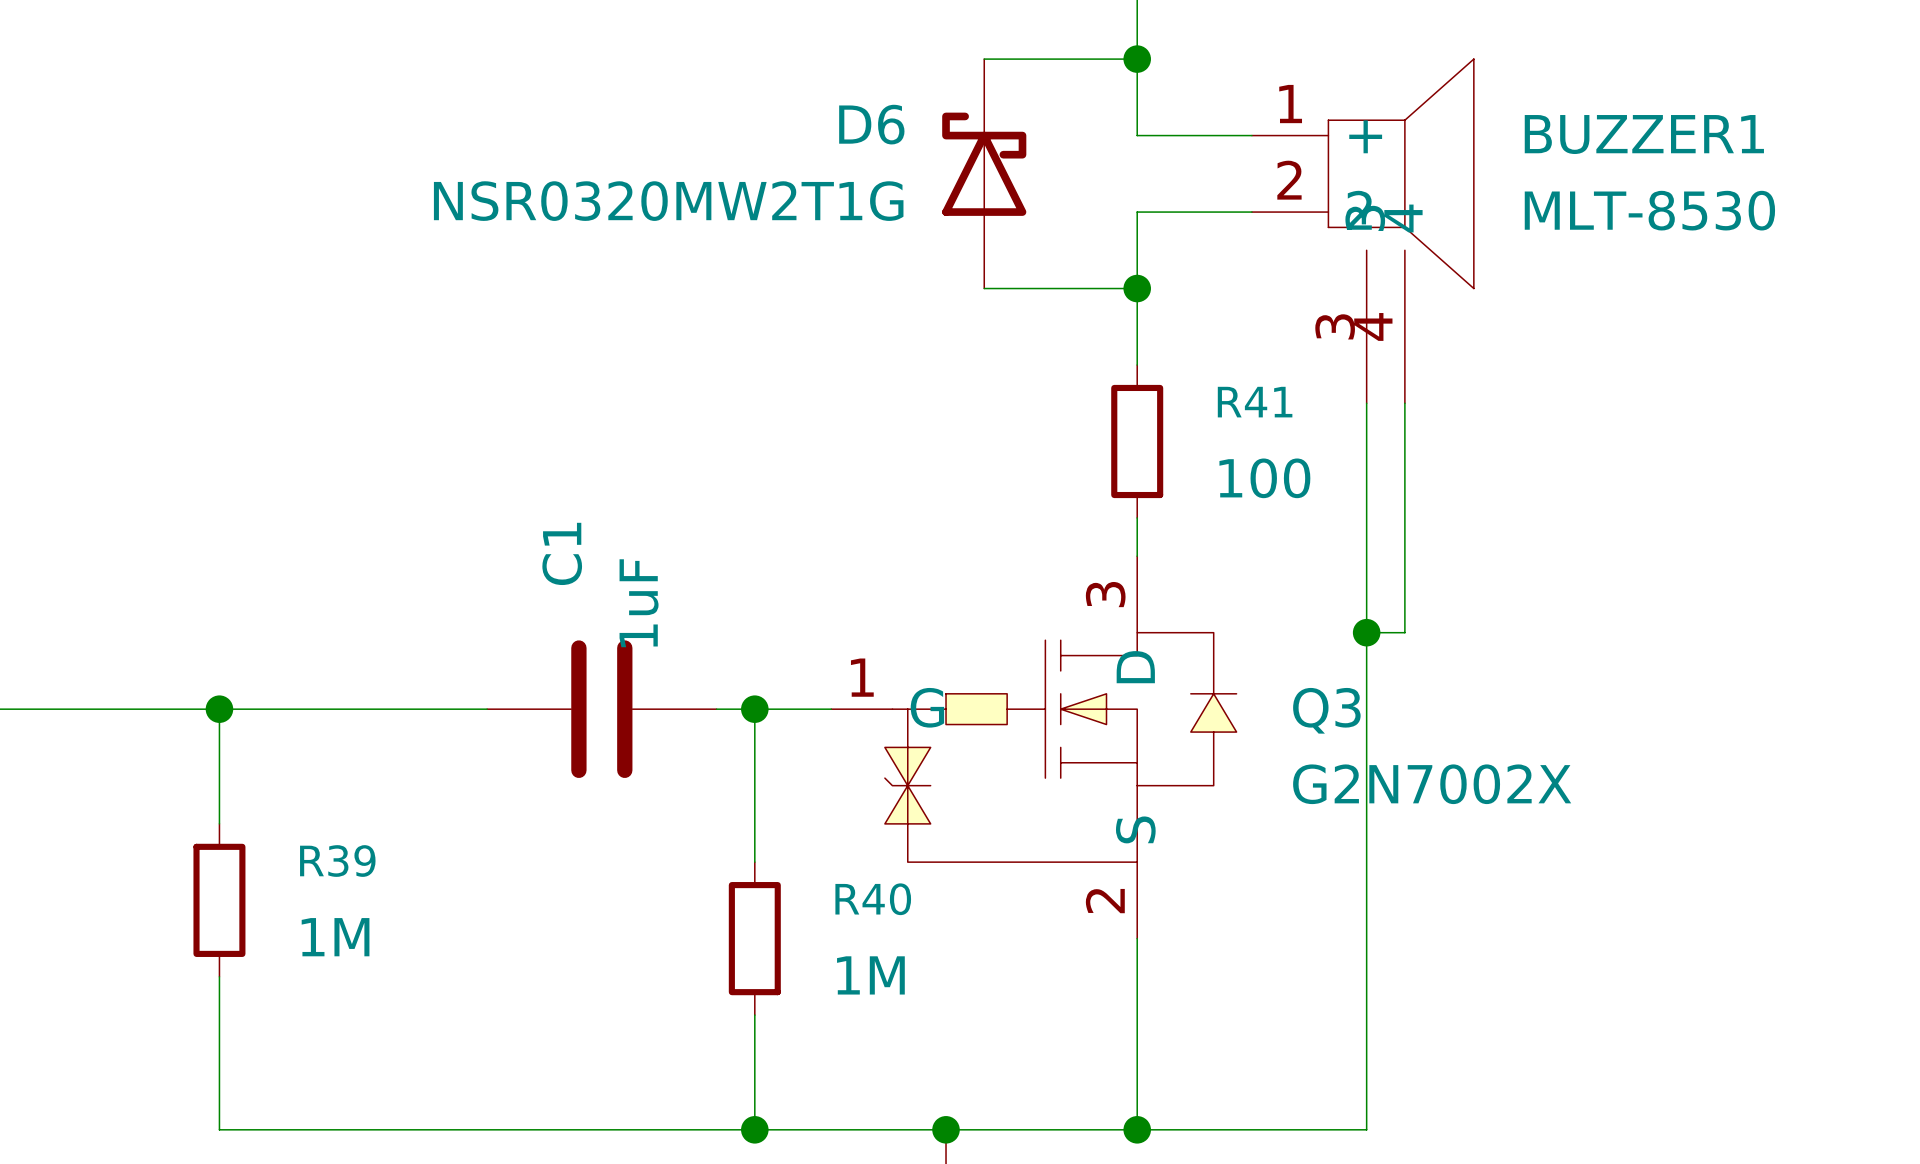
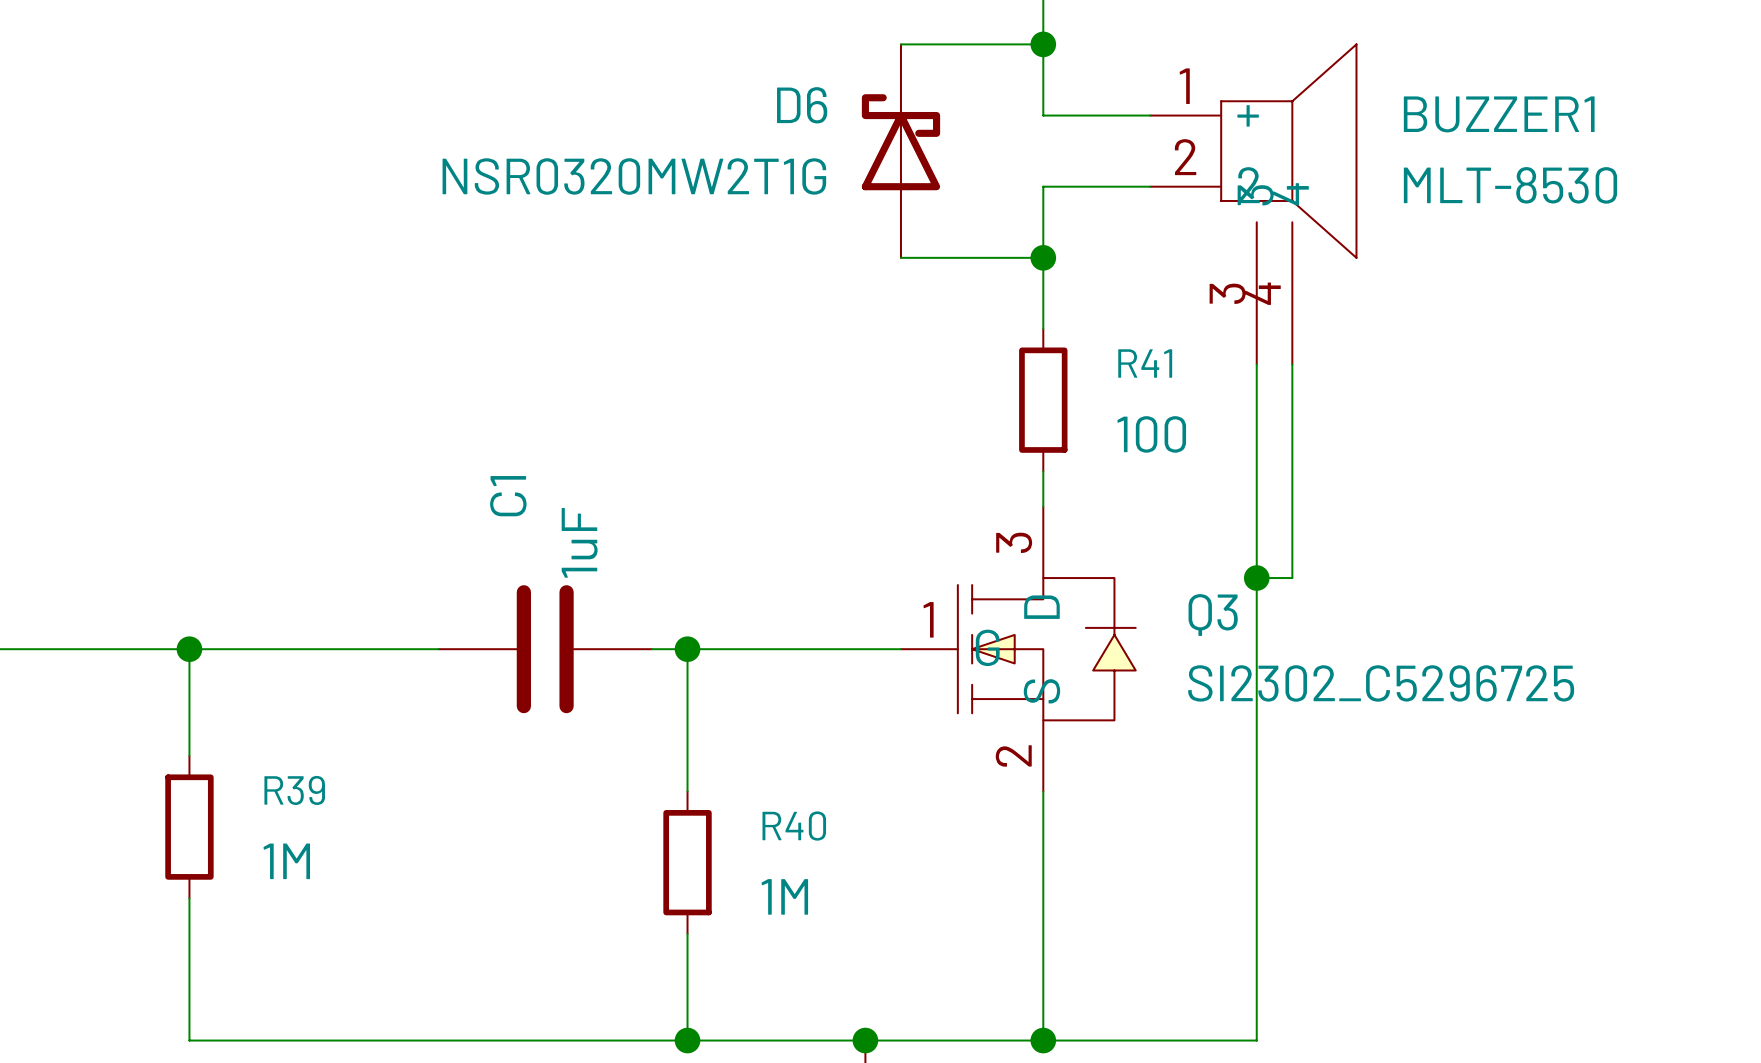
Q3 symbol: [831, 556, 1237, 939] -> [900, 506, 1136, 792]
Q3 name position: Q3 (1326, 710) -> Q3 (1213, 615)
Q3 value: G2N7002X (1432, 784) -> SI2302_C5296725 (1381, 683)

